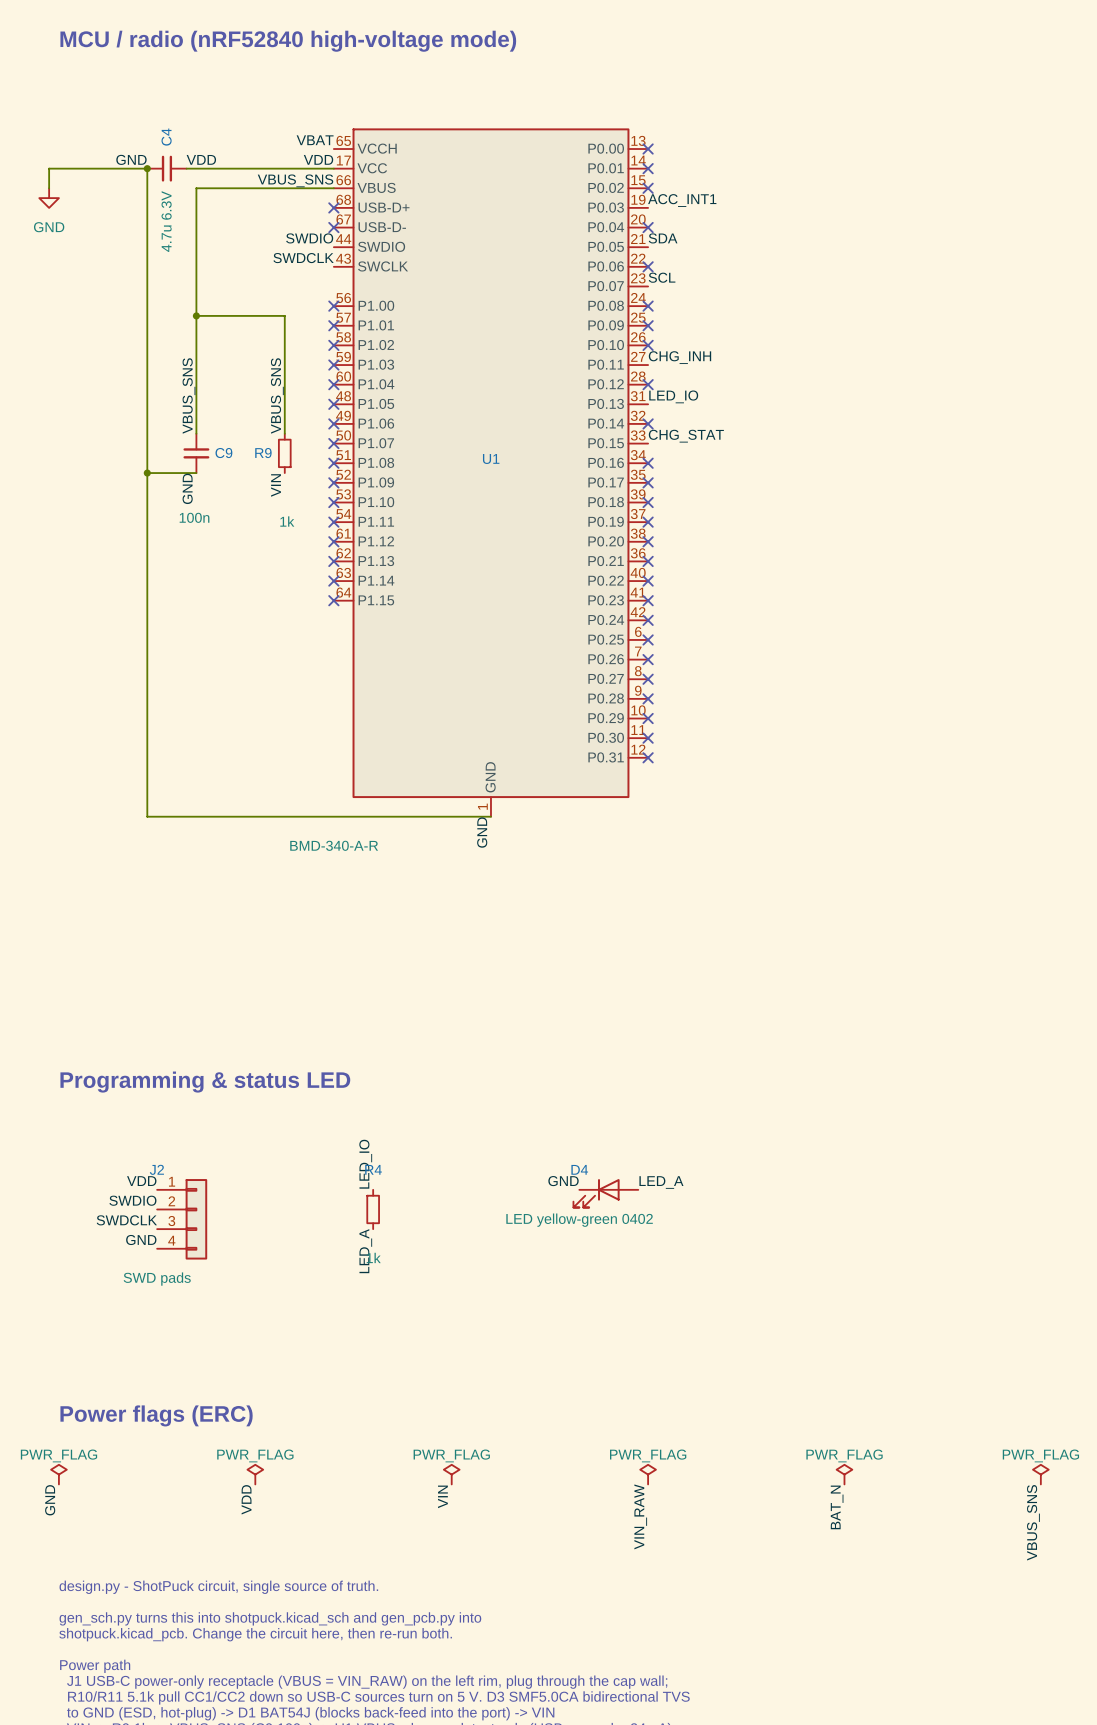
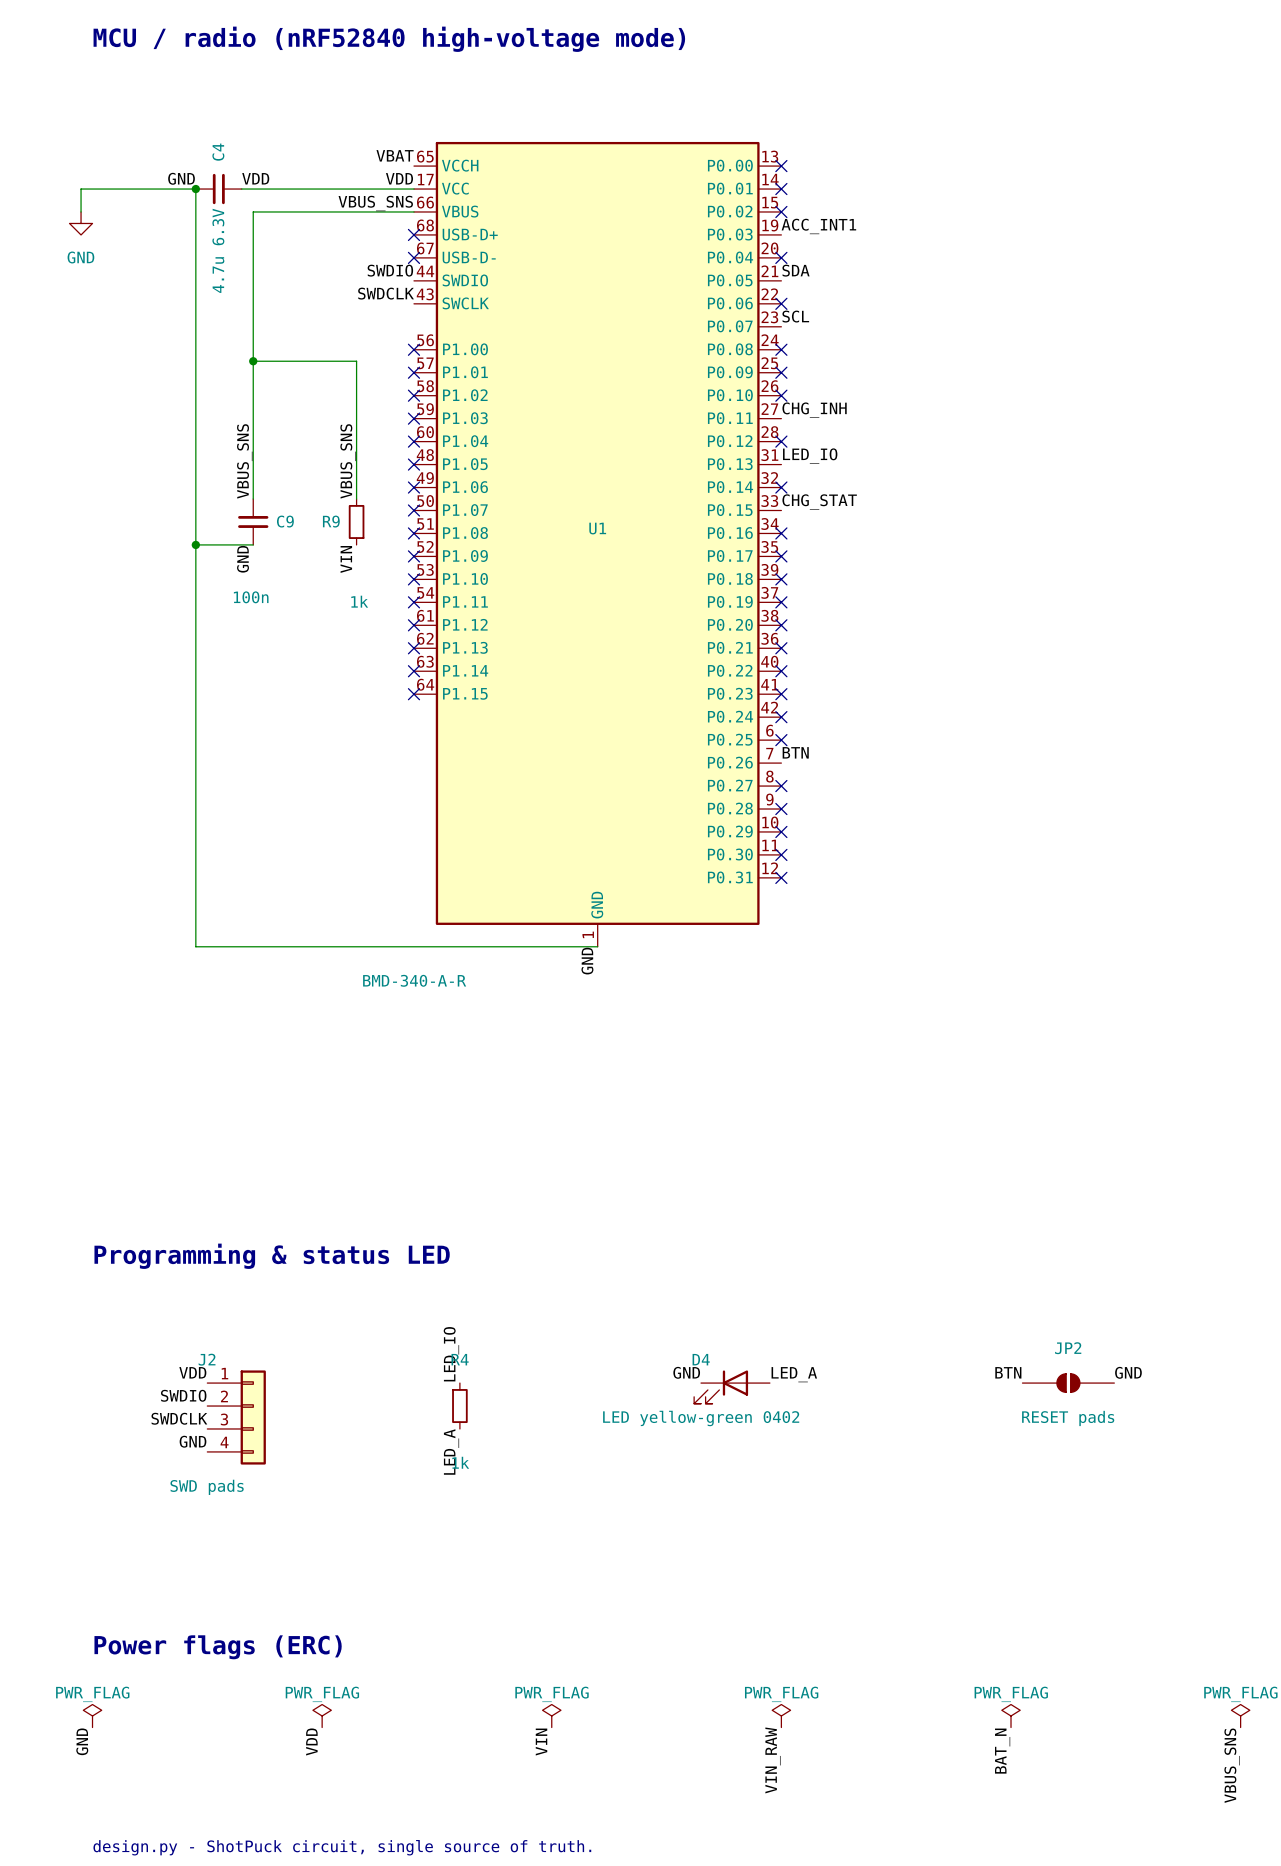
label: none -> BTN (795, 752)
no-connect mark: (648, 659) -> none
label: none -> BTN (1008, 1372)
label: none -> GND (1128, 1372)
JP2: none -> RESET pads (1068, 1383)

